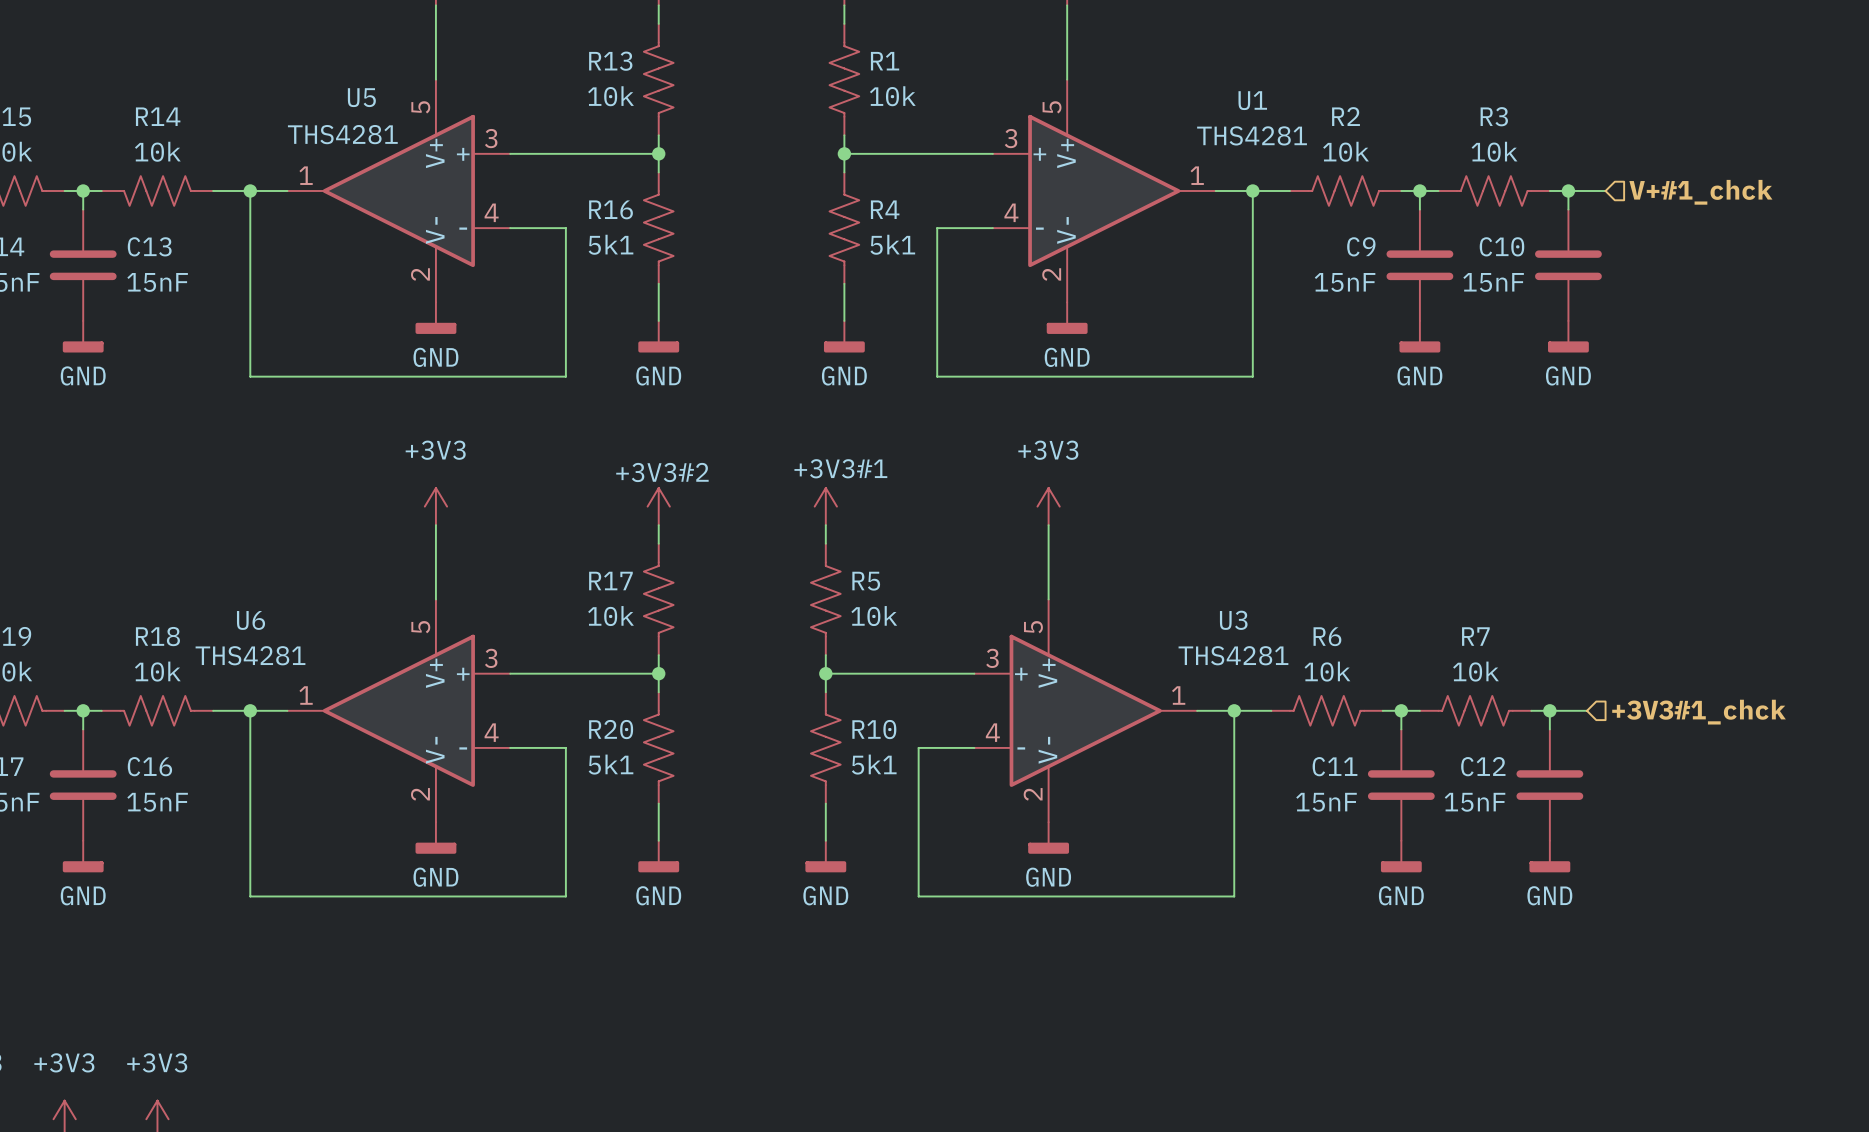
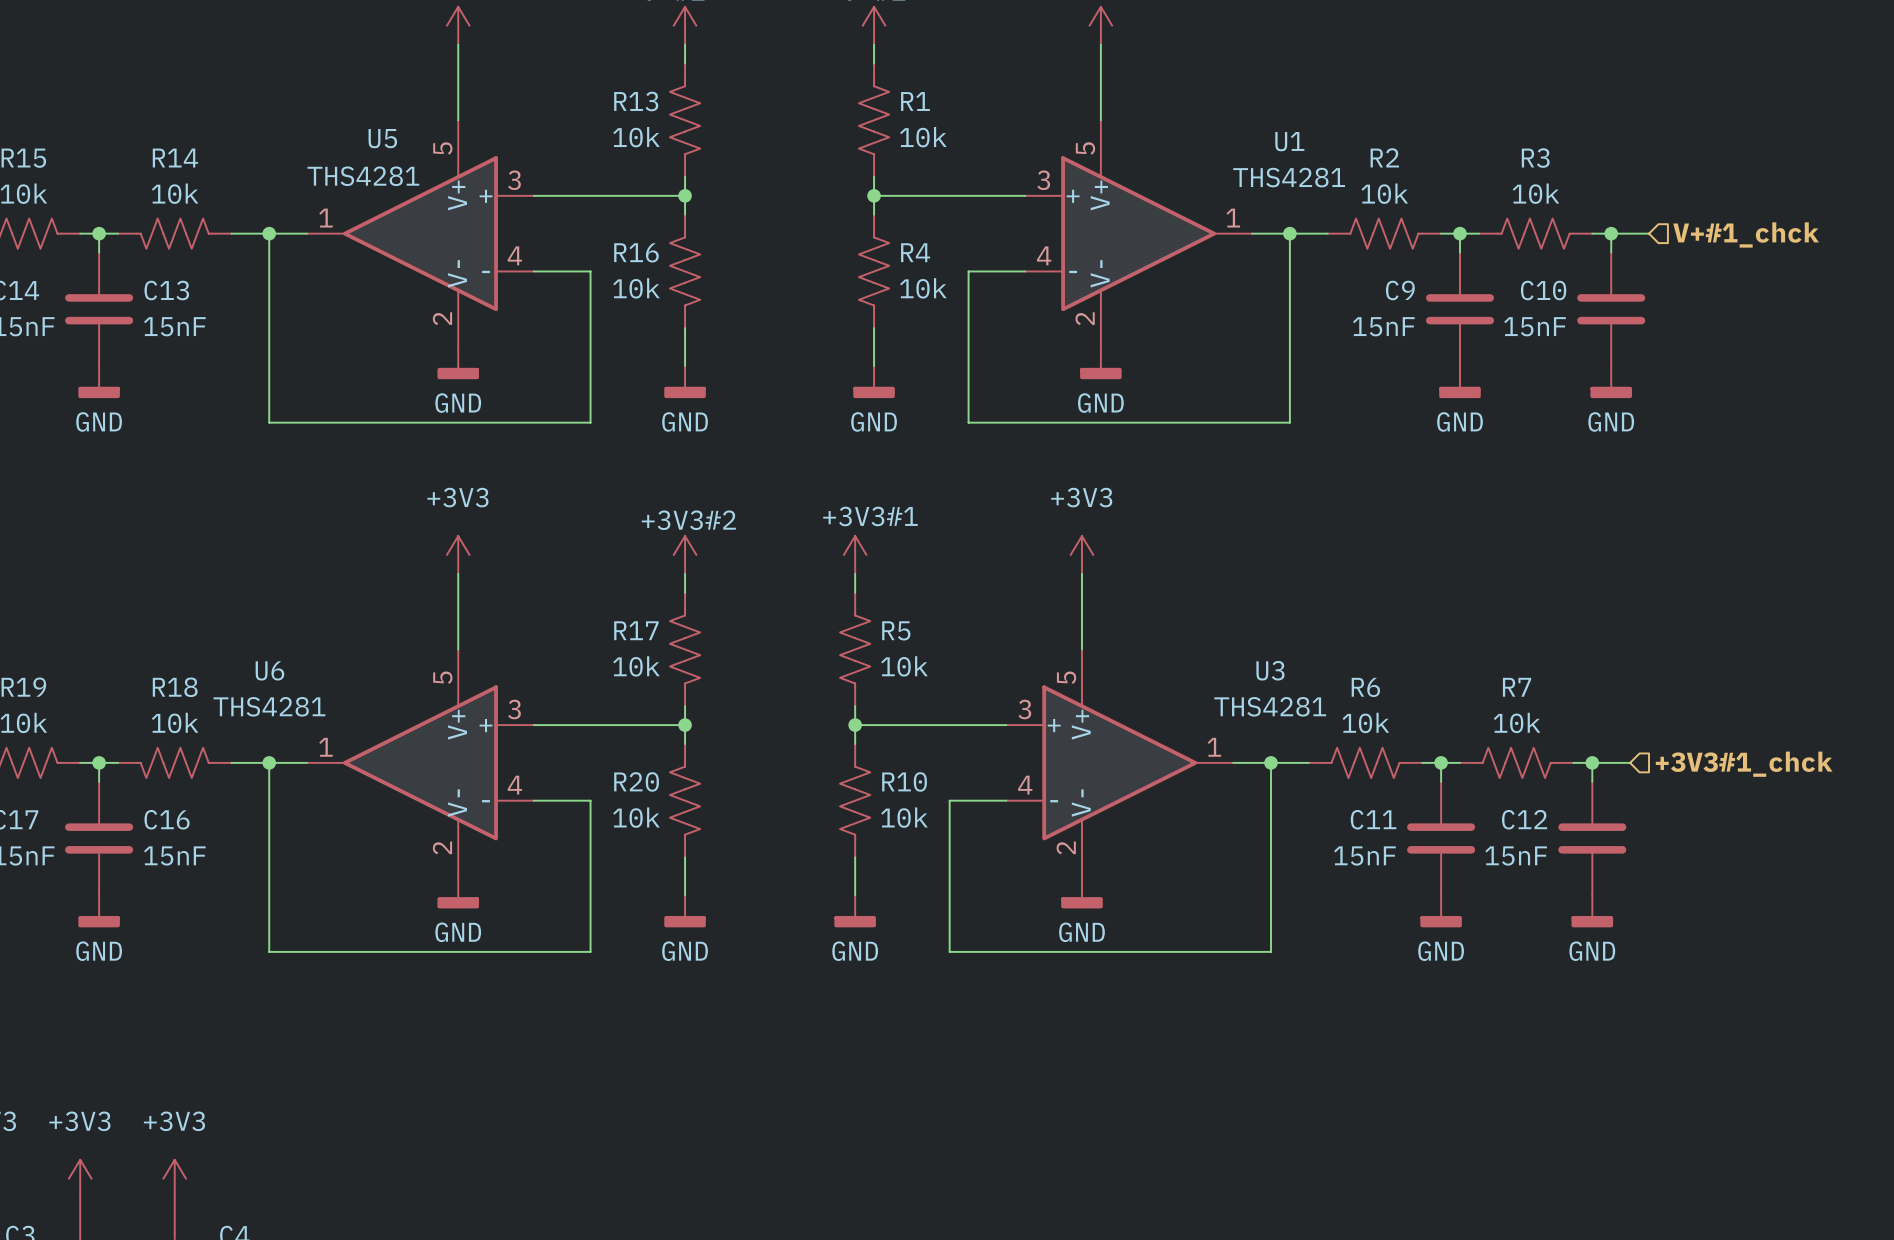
R16 value: 5k1 (611, 244) -> 10k (636, 288)
R4 value: 5k1 (892, 244) -> 10k (923, 288)
R20 value: 5k1 (611, 764) -> 10k (636, 817)
R10 value: 5k1 (874, 764) -> 10k (904, 817)

